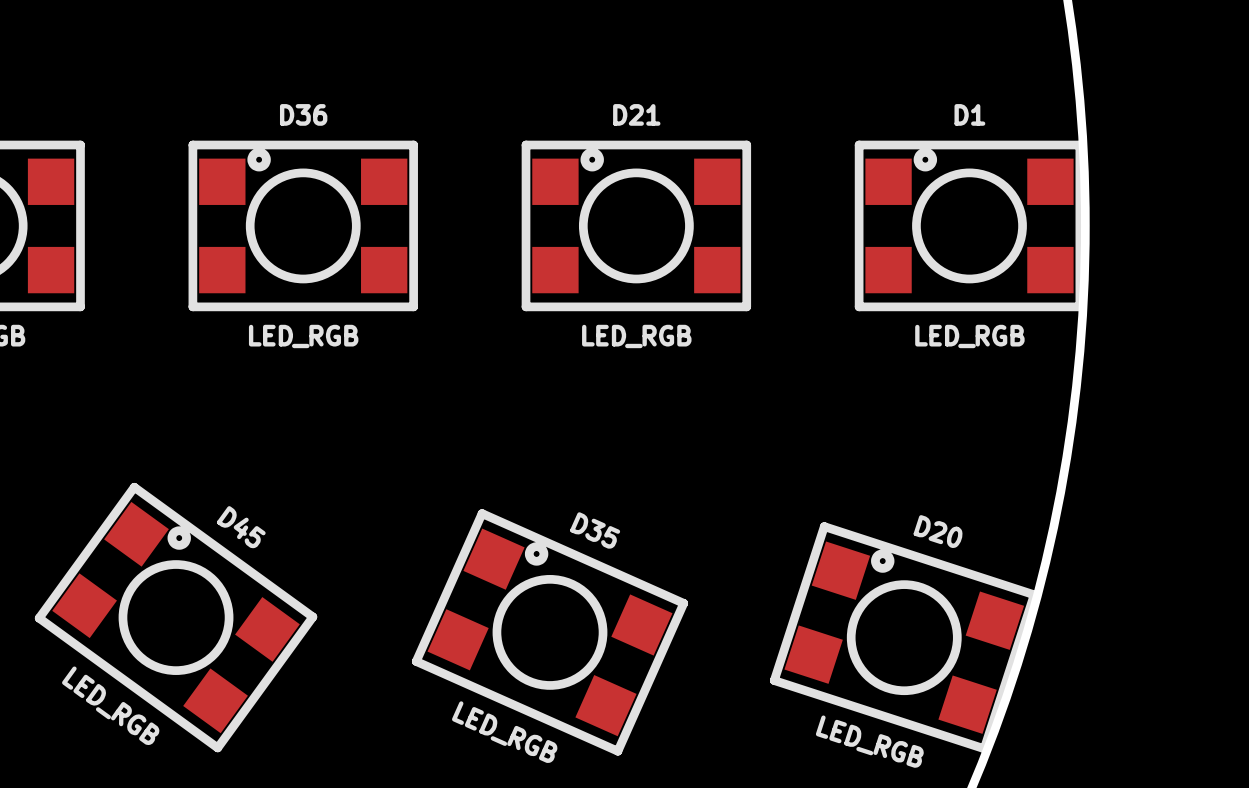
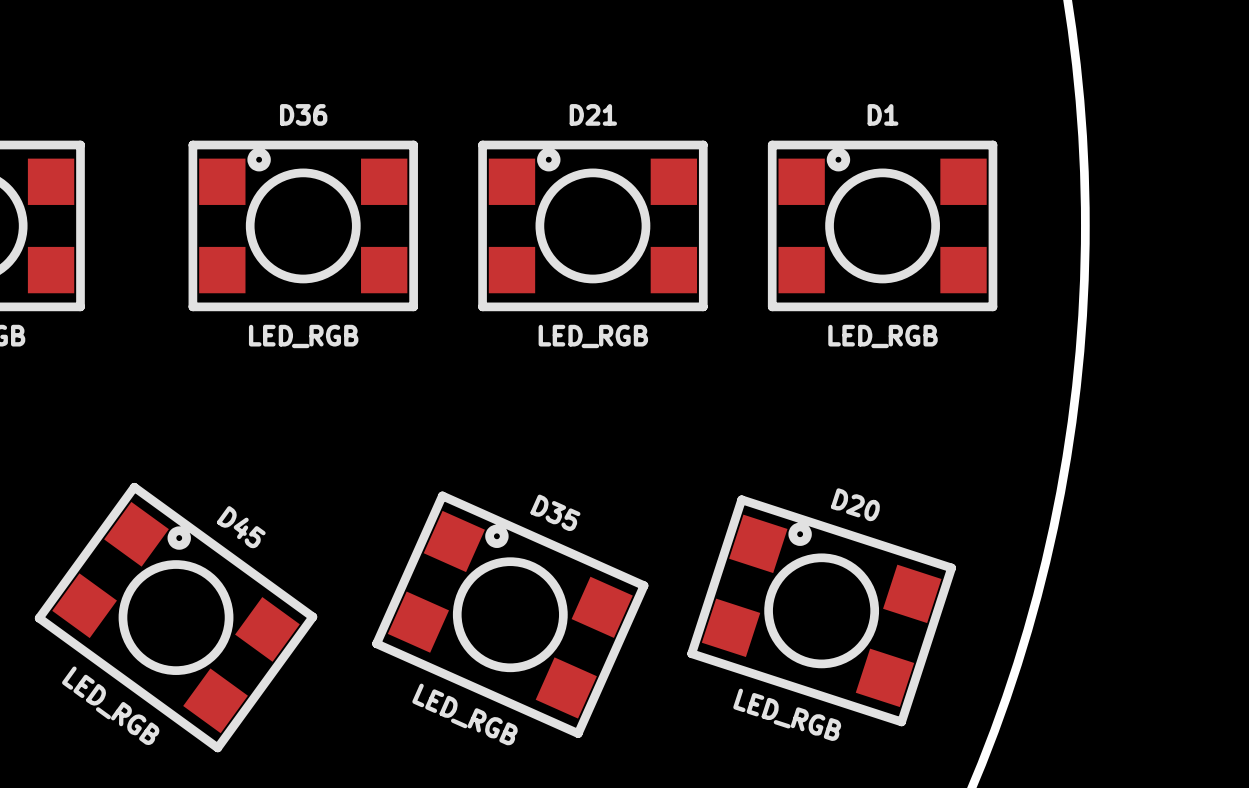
D21 position: (636, 225) -> (592, 225)
D1 position: (969, 225) -> (882, 225)
D35 position: (549, 632) -> (510, 614)
D20 position: (904, 637) -> (821, 610)

